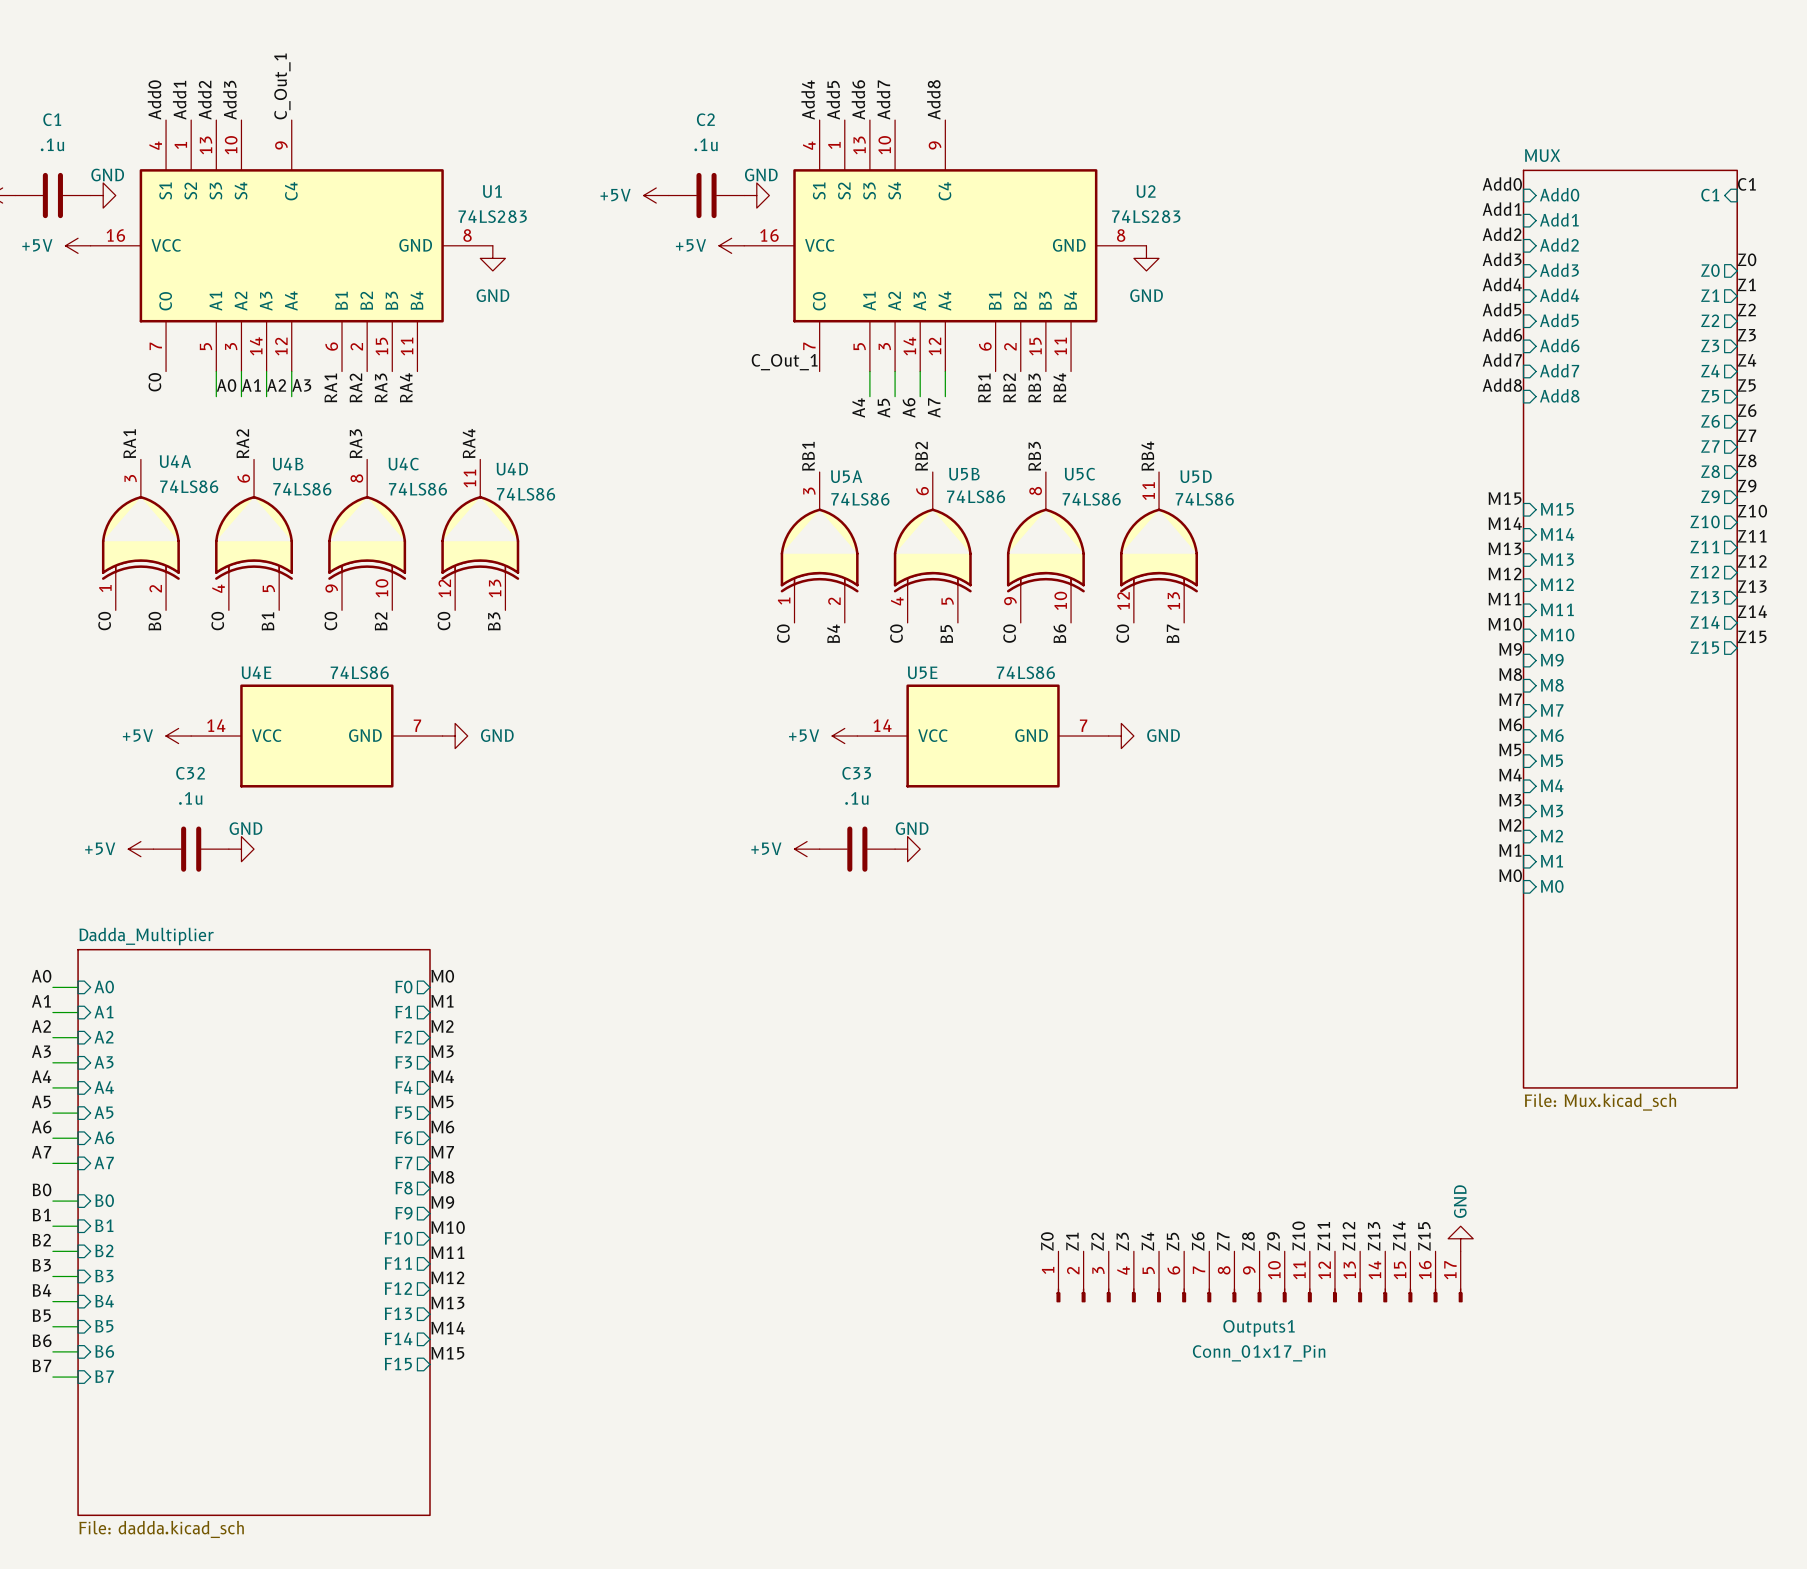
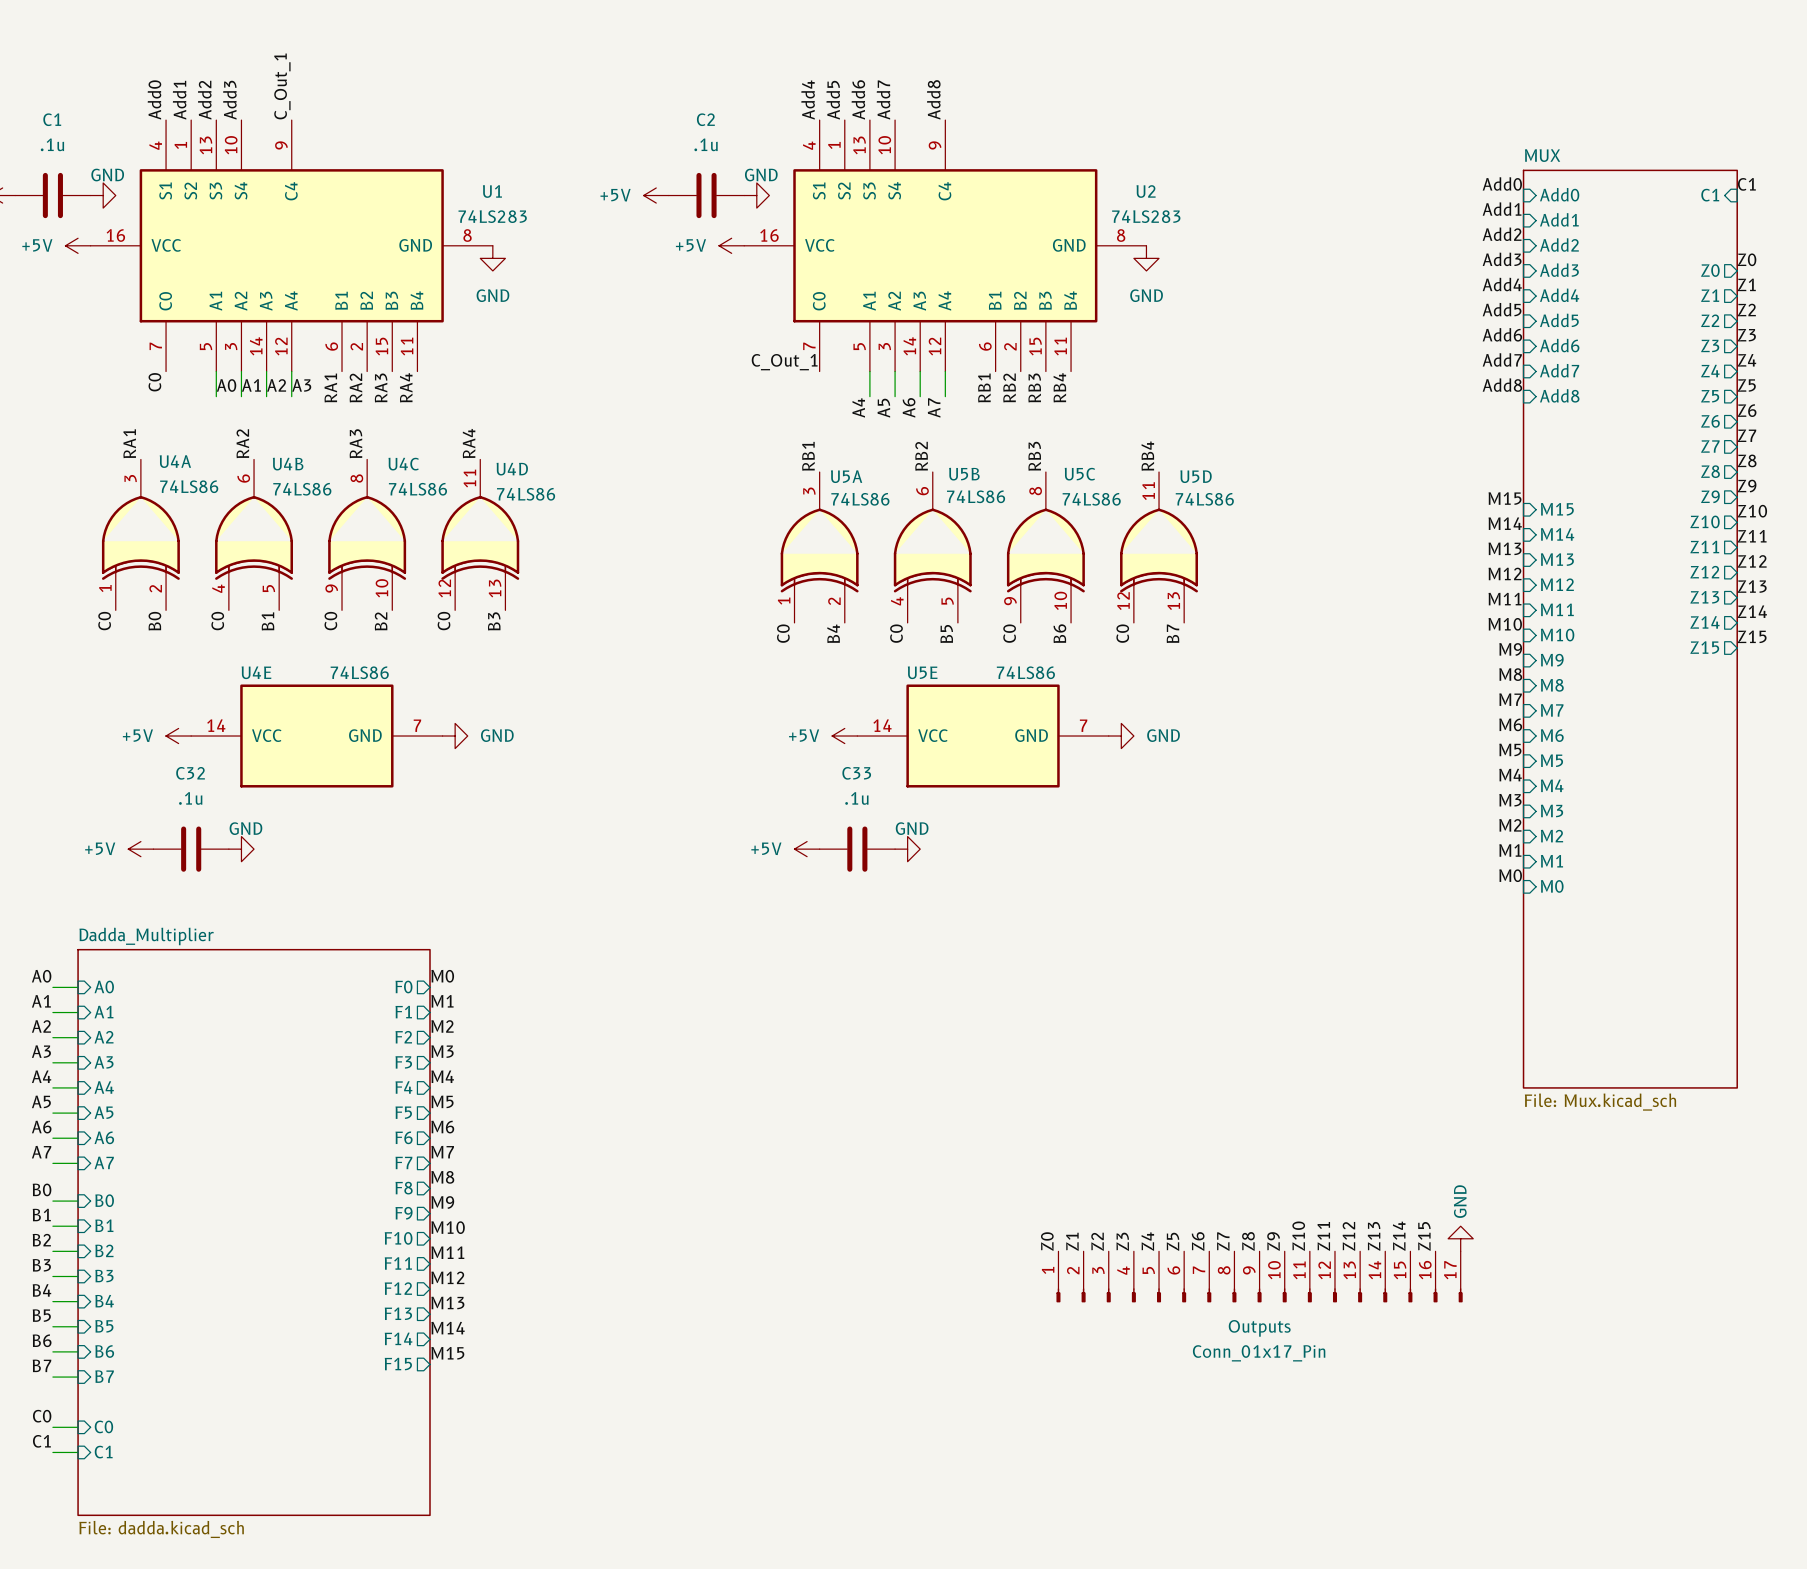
Outputs1 name: Outputs1 (1259, 1328) -> Outputs (1259, 1328)
label: none -> C0 (42, 1416)
sheet pin: none -> C0 (103, 1426)
wire: none -> (52, 1427) (78, 1427)
label: none -> C1 (41, 1441)
wire: none -> (52, 1452) (78, 1452)
sheet pin: none -> C1 (103, 1452)

